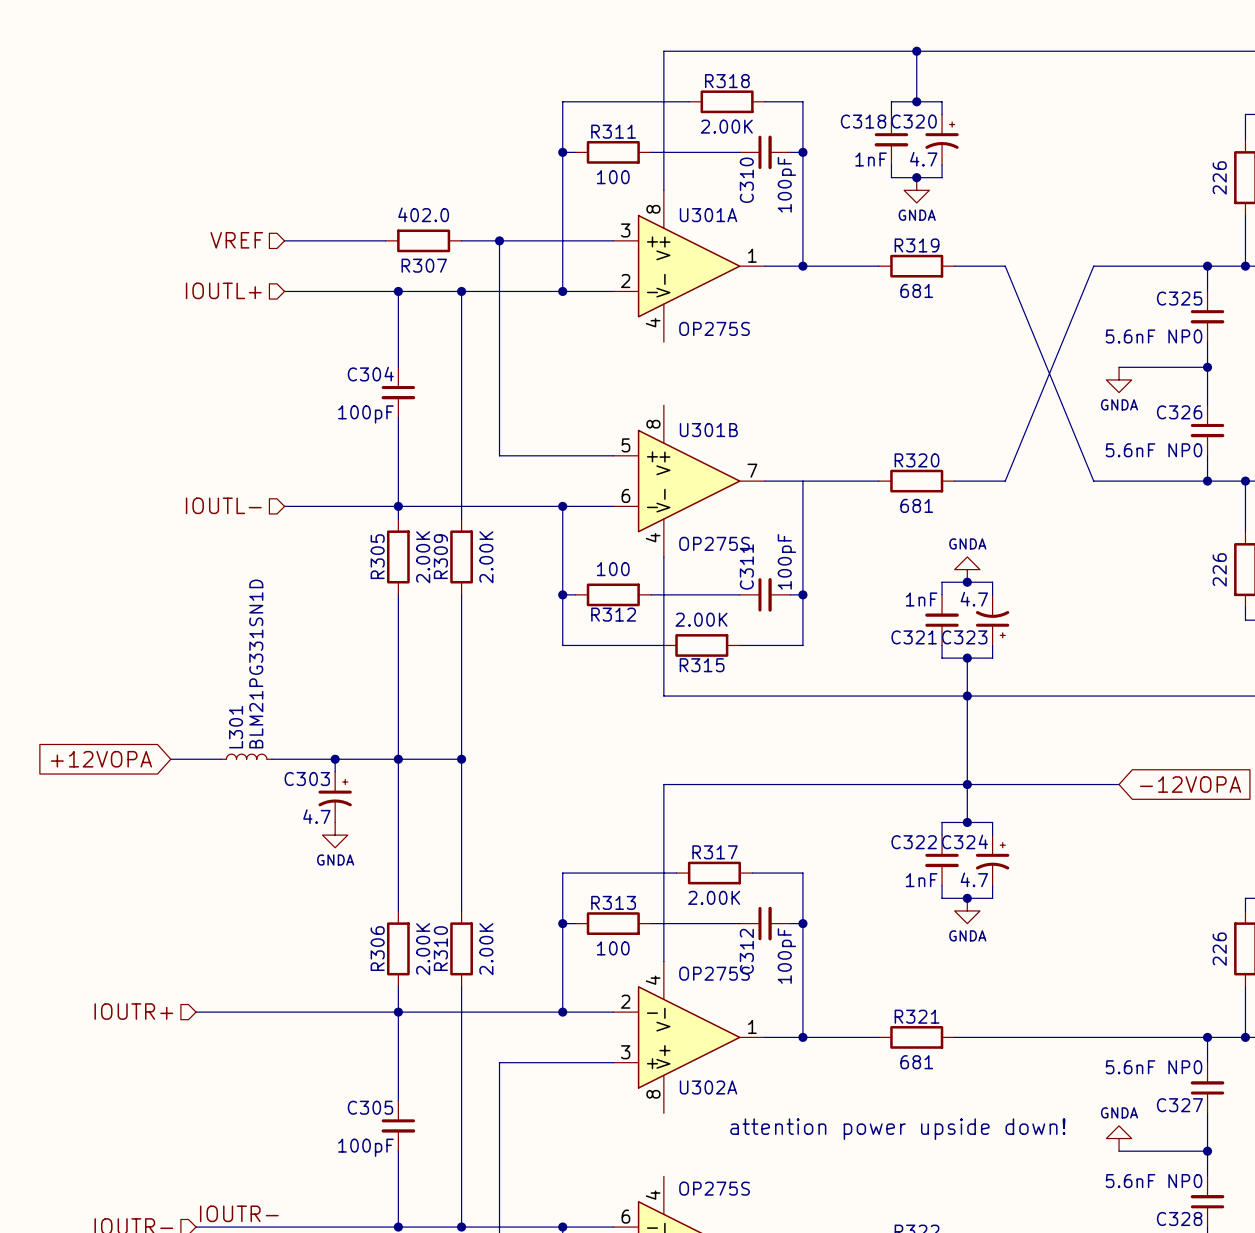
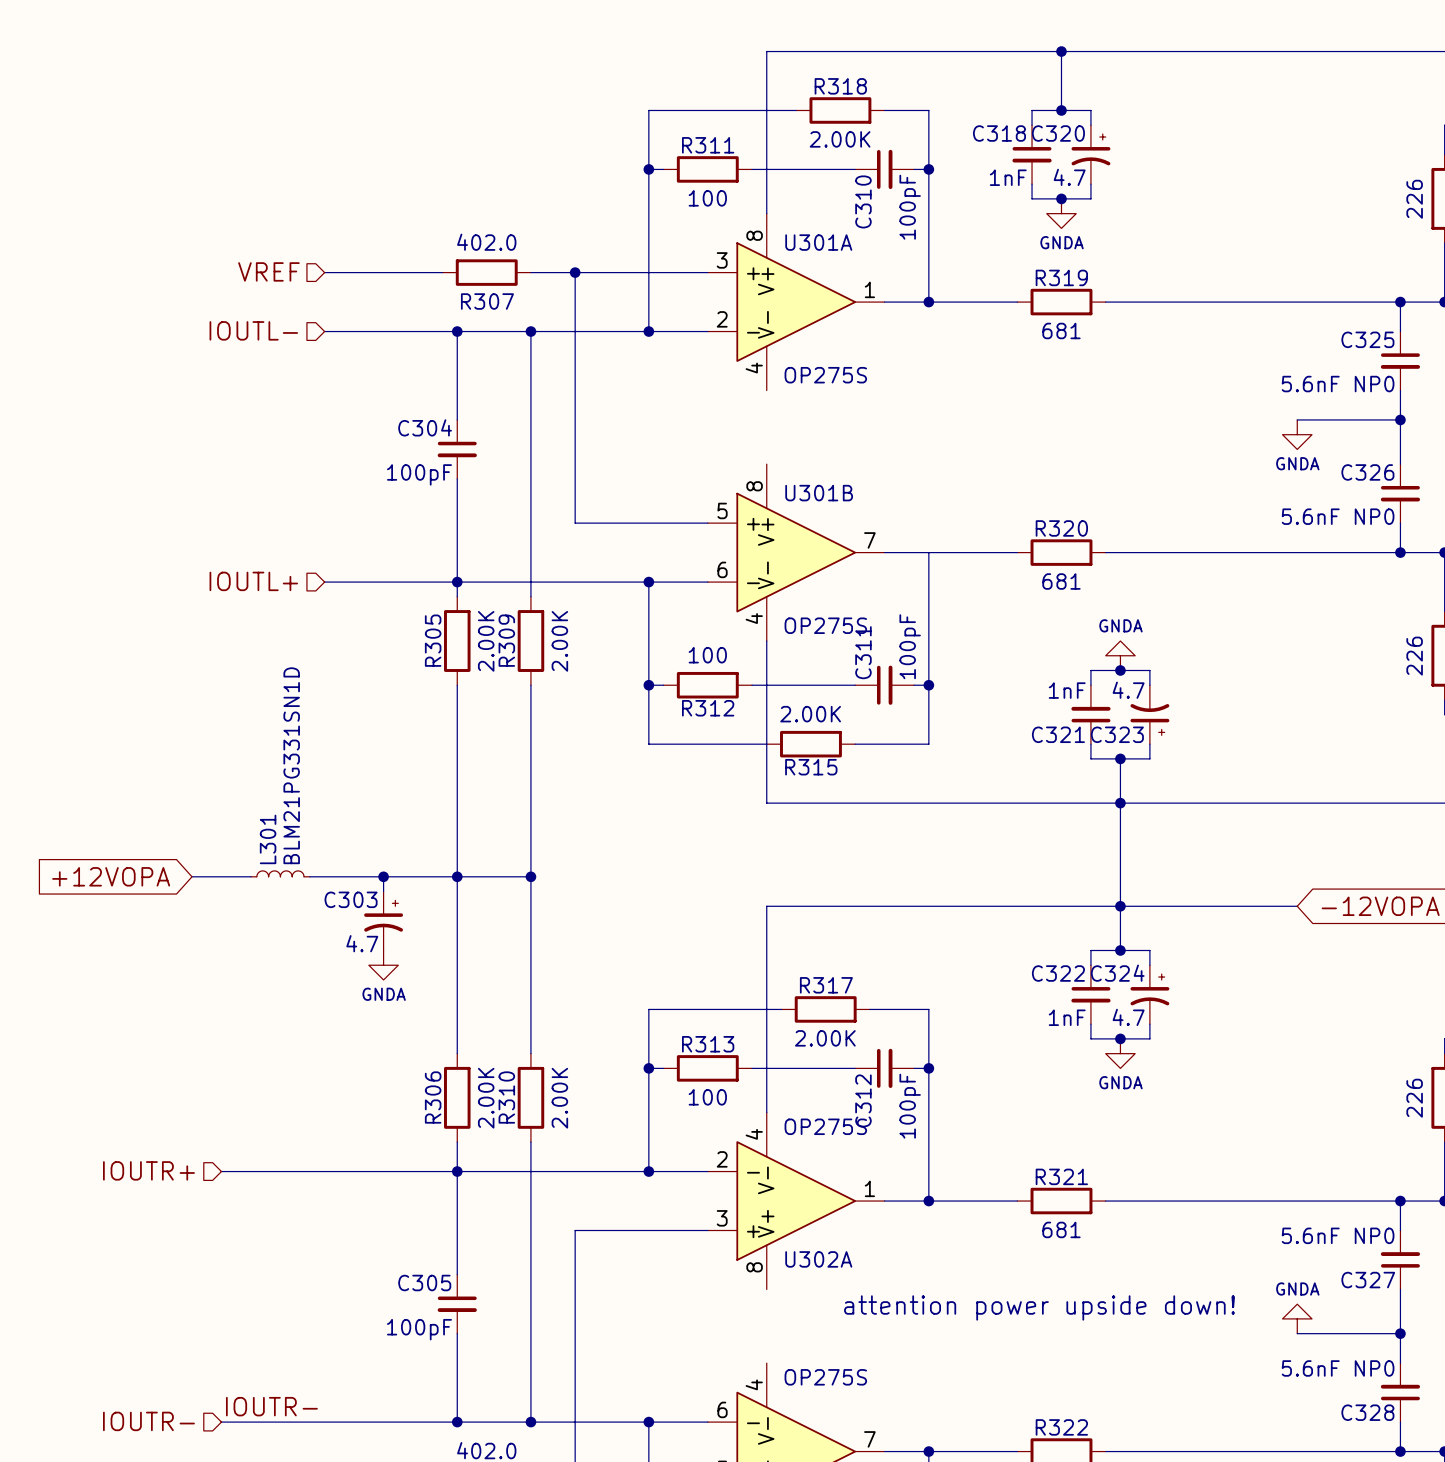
wire: (1005, 266) (1093, 481) -> (1164, 302) (1267, 302)
wire: (1093, 266) (1005, 481) -> (1267, 552) (1164, 552)
hierarchical label: IOUTL+ (223, 290) -> IOUTL- (253, 330)
hierarchical label: IOUTL- (223, 505) -> IOUTL+ (253, 581)

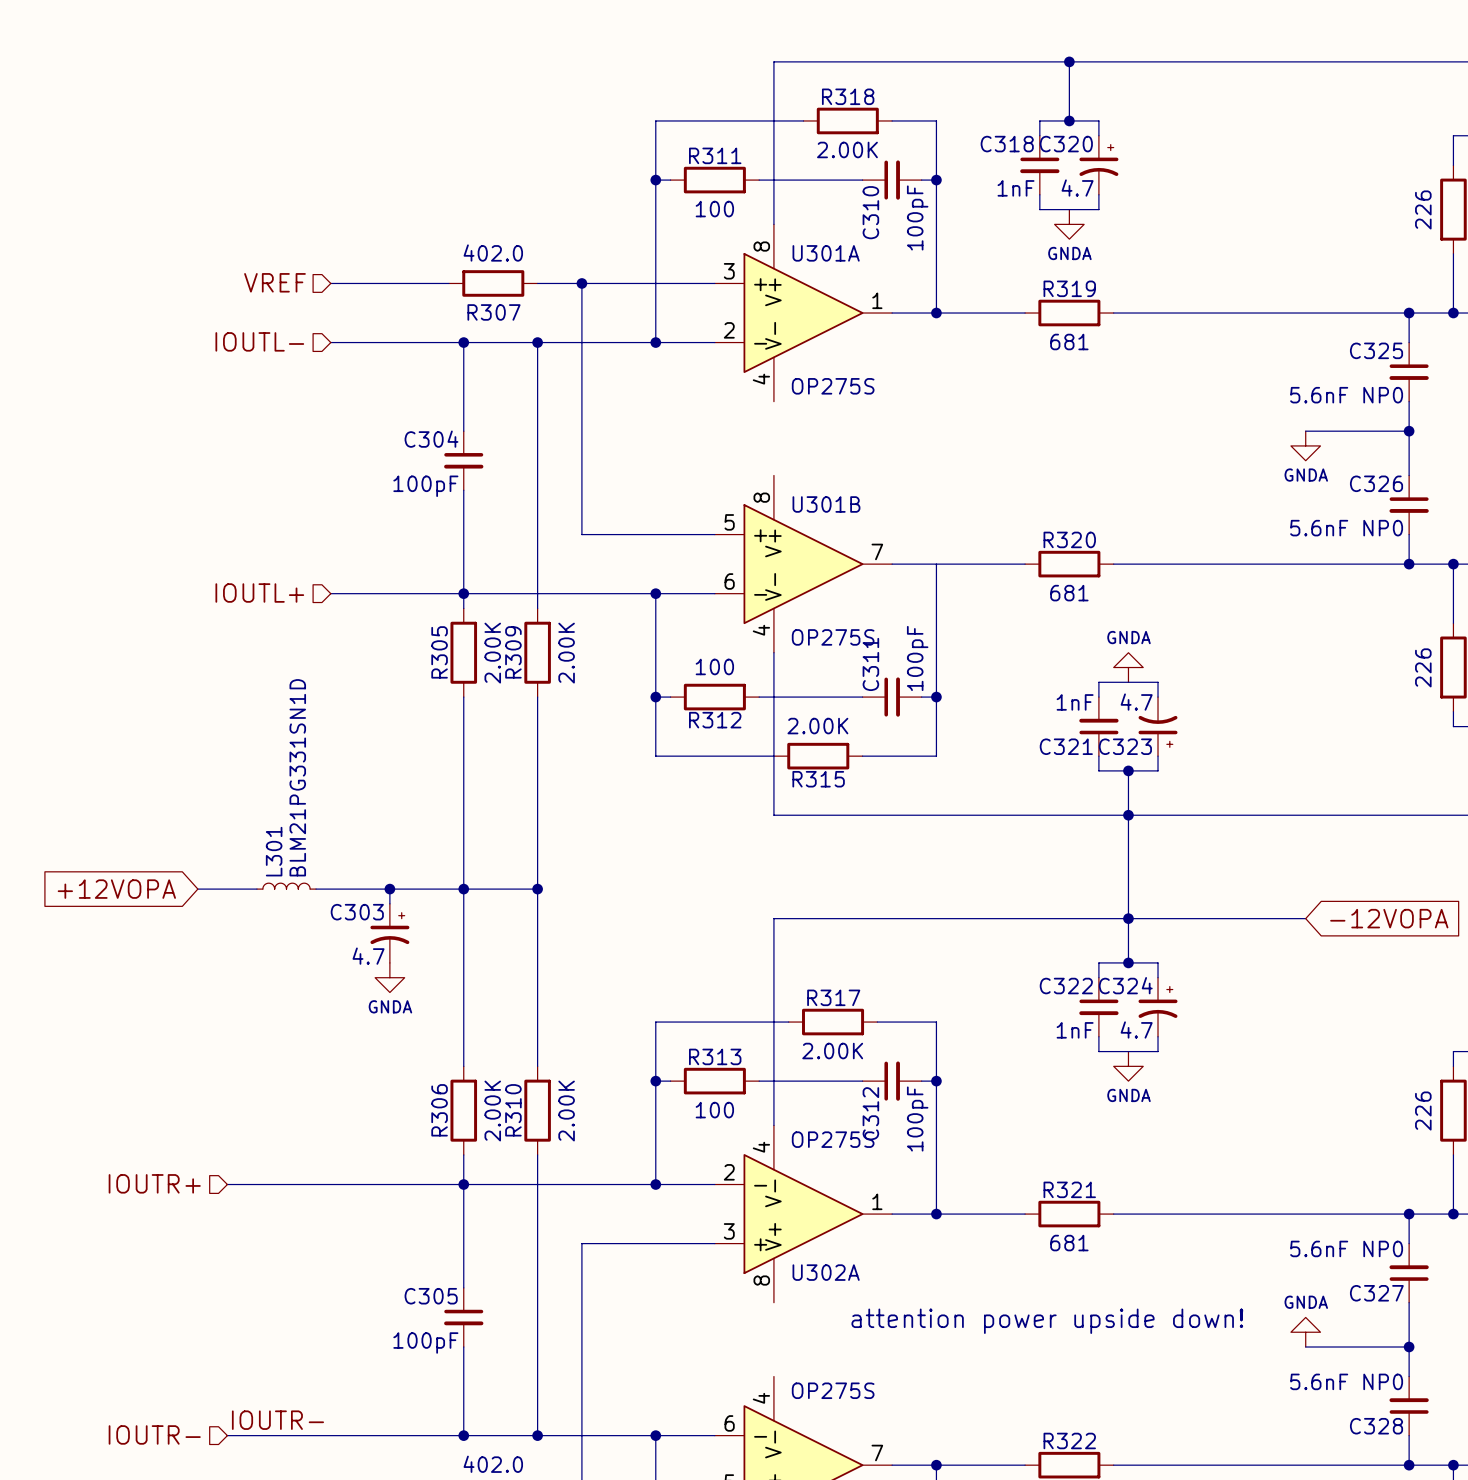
junction: (1061, 198) -> none
junction: (1120, 670) -> none
junction: (1120, 1038) -> none

